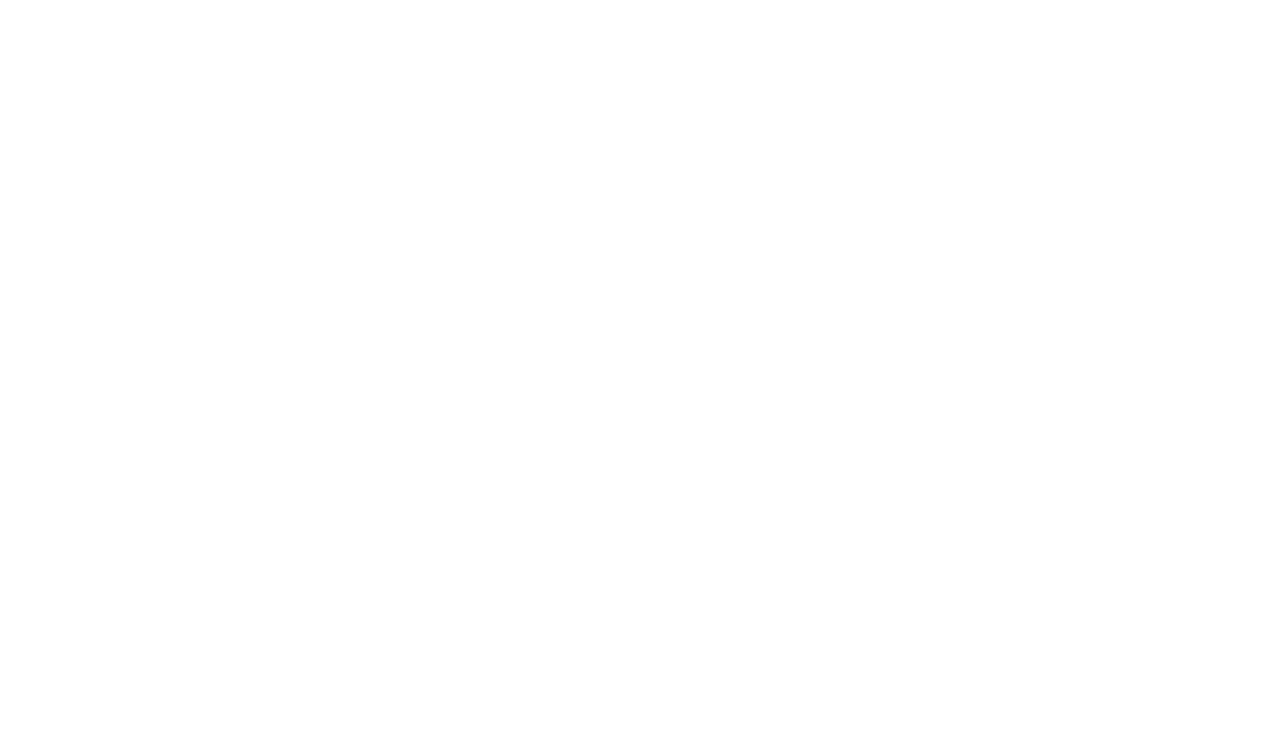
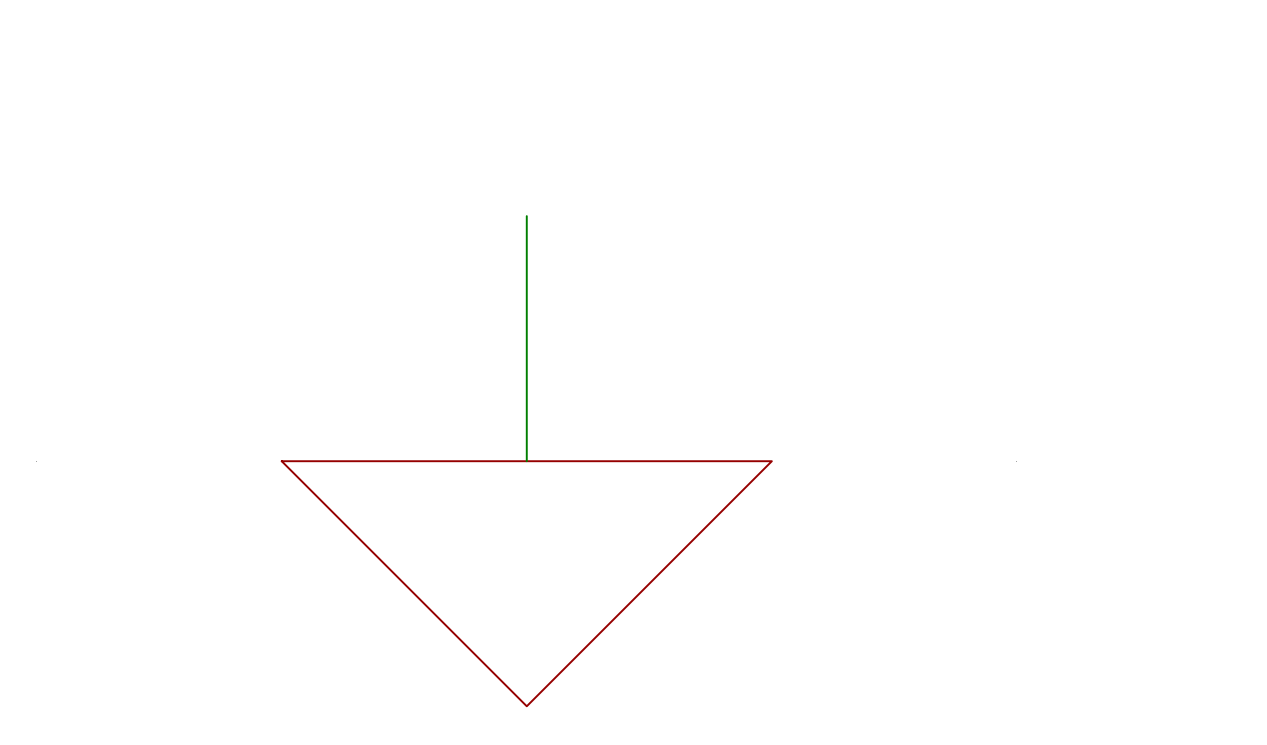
wire: none -> (526, 216) (526, 461)
power symbol: none -> (526, 583)

